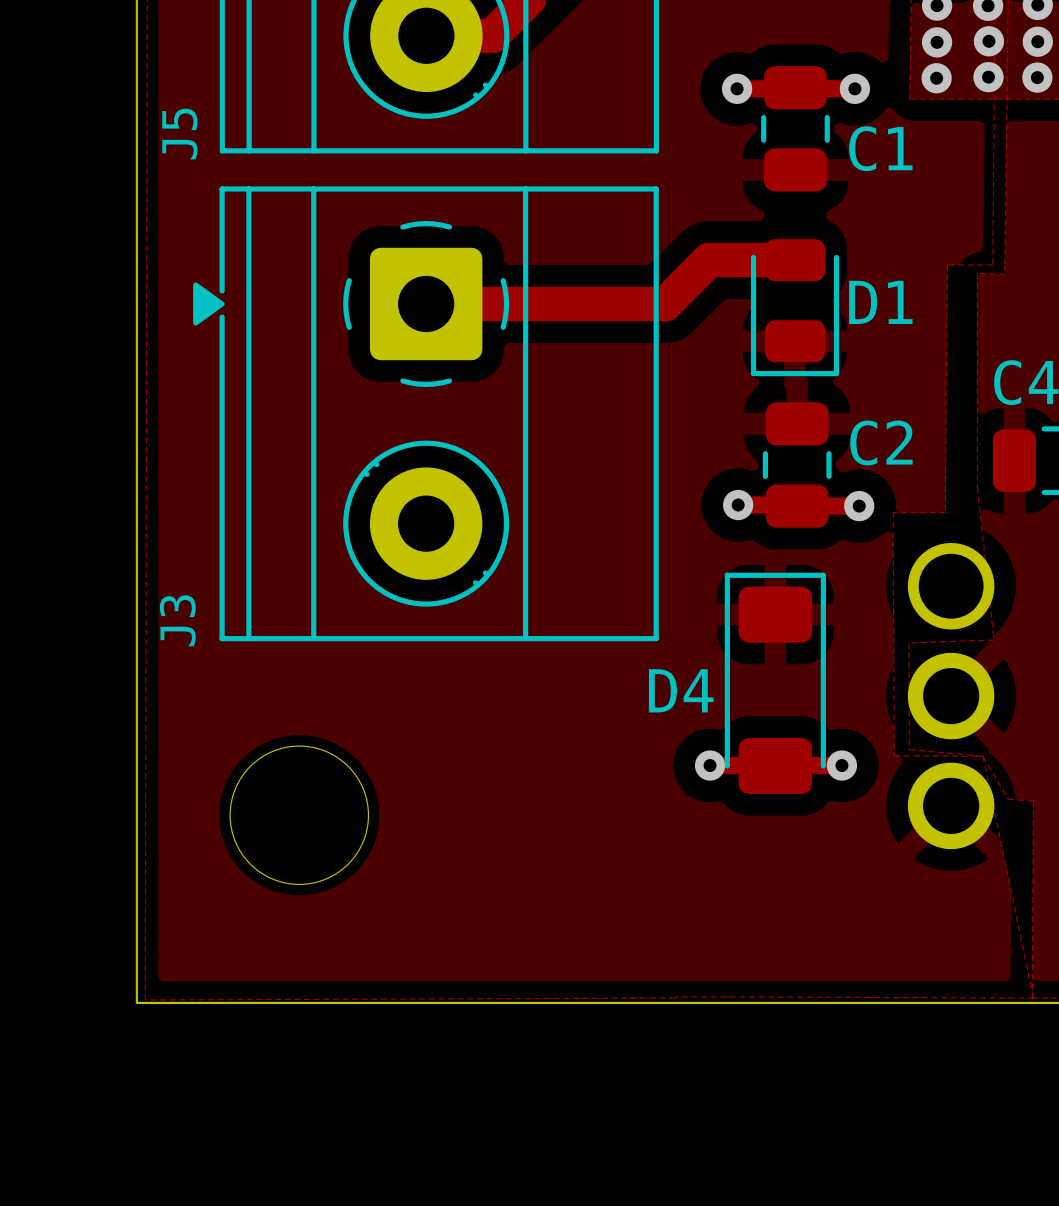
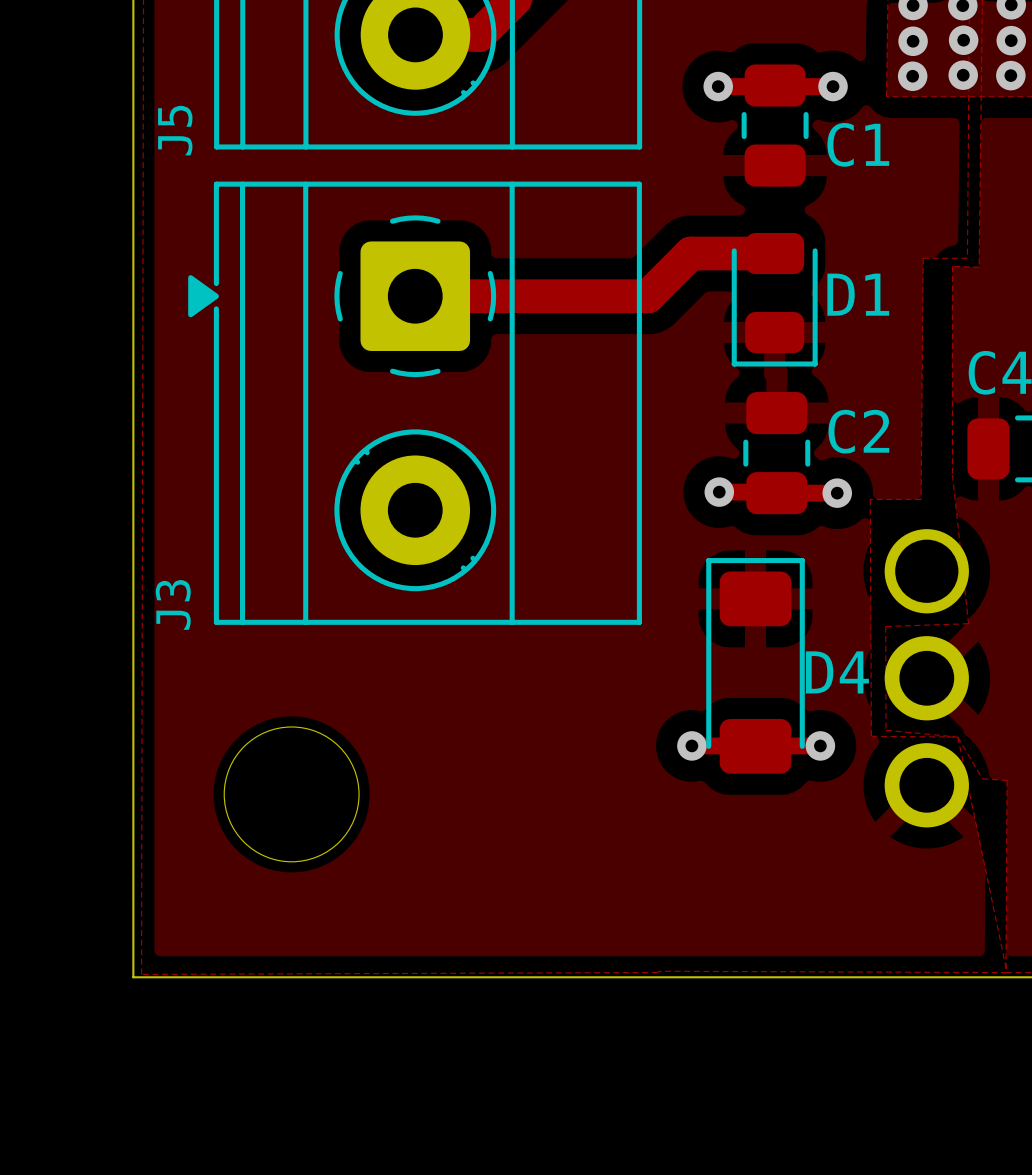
D4 name position: D4 (681, 690) -> D4 (837, 672)

